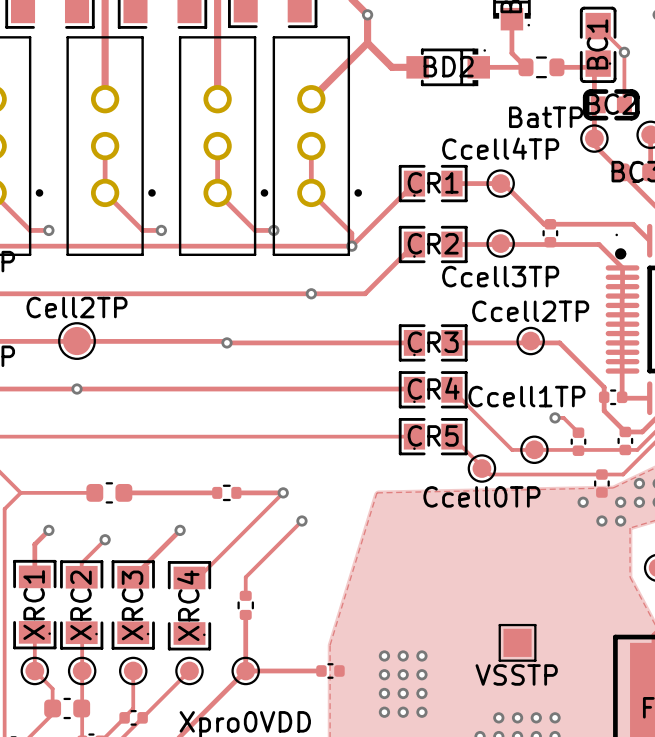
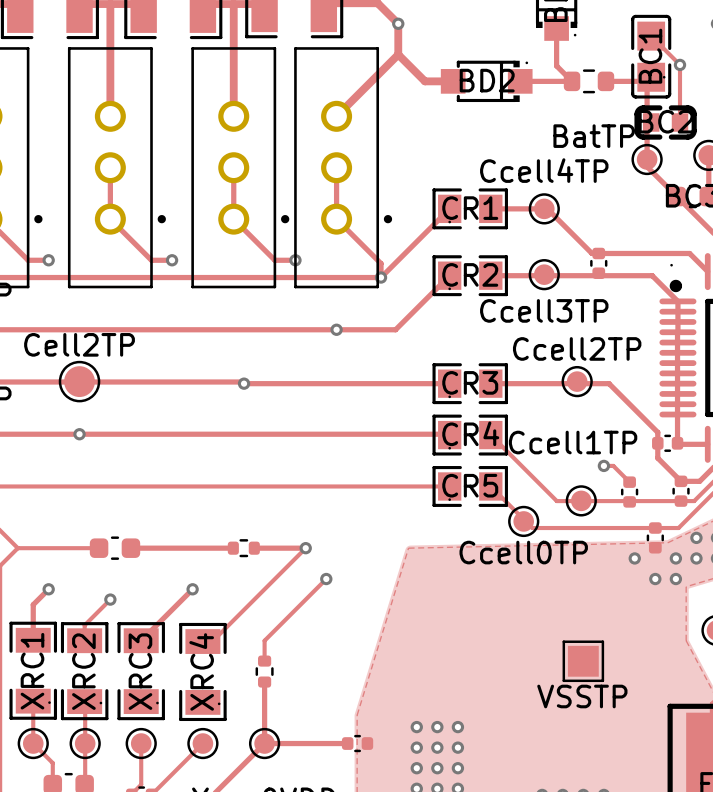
part position: (517, 642) -> (583, 661)

